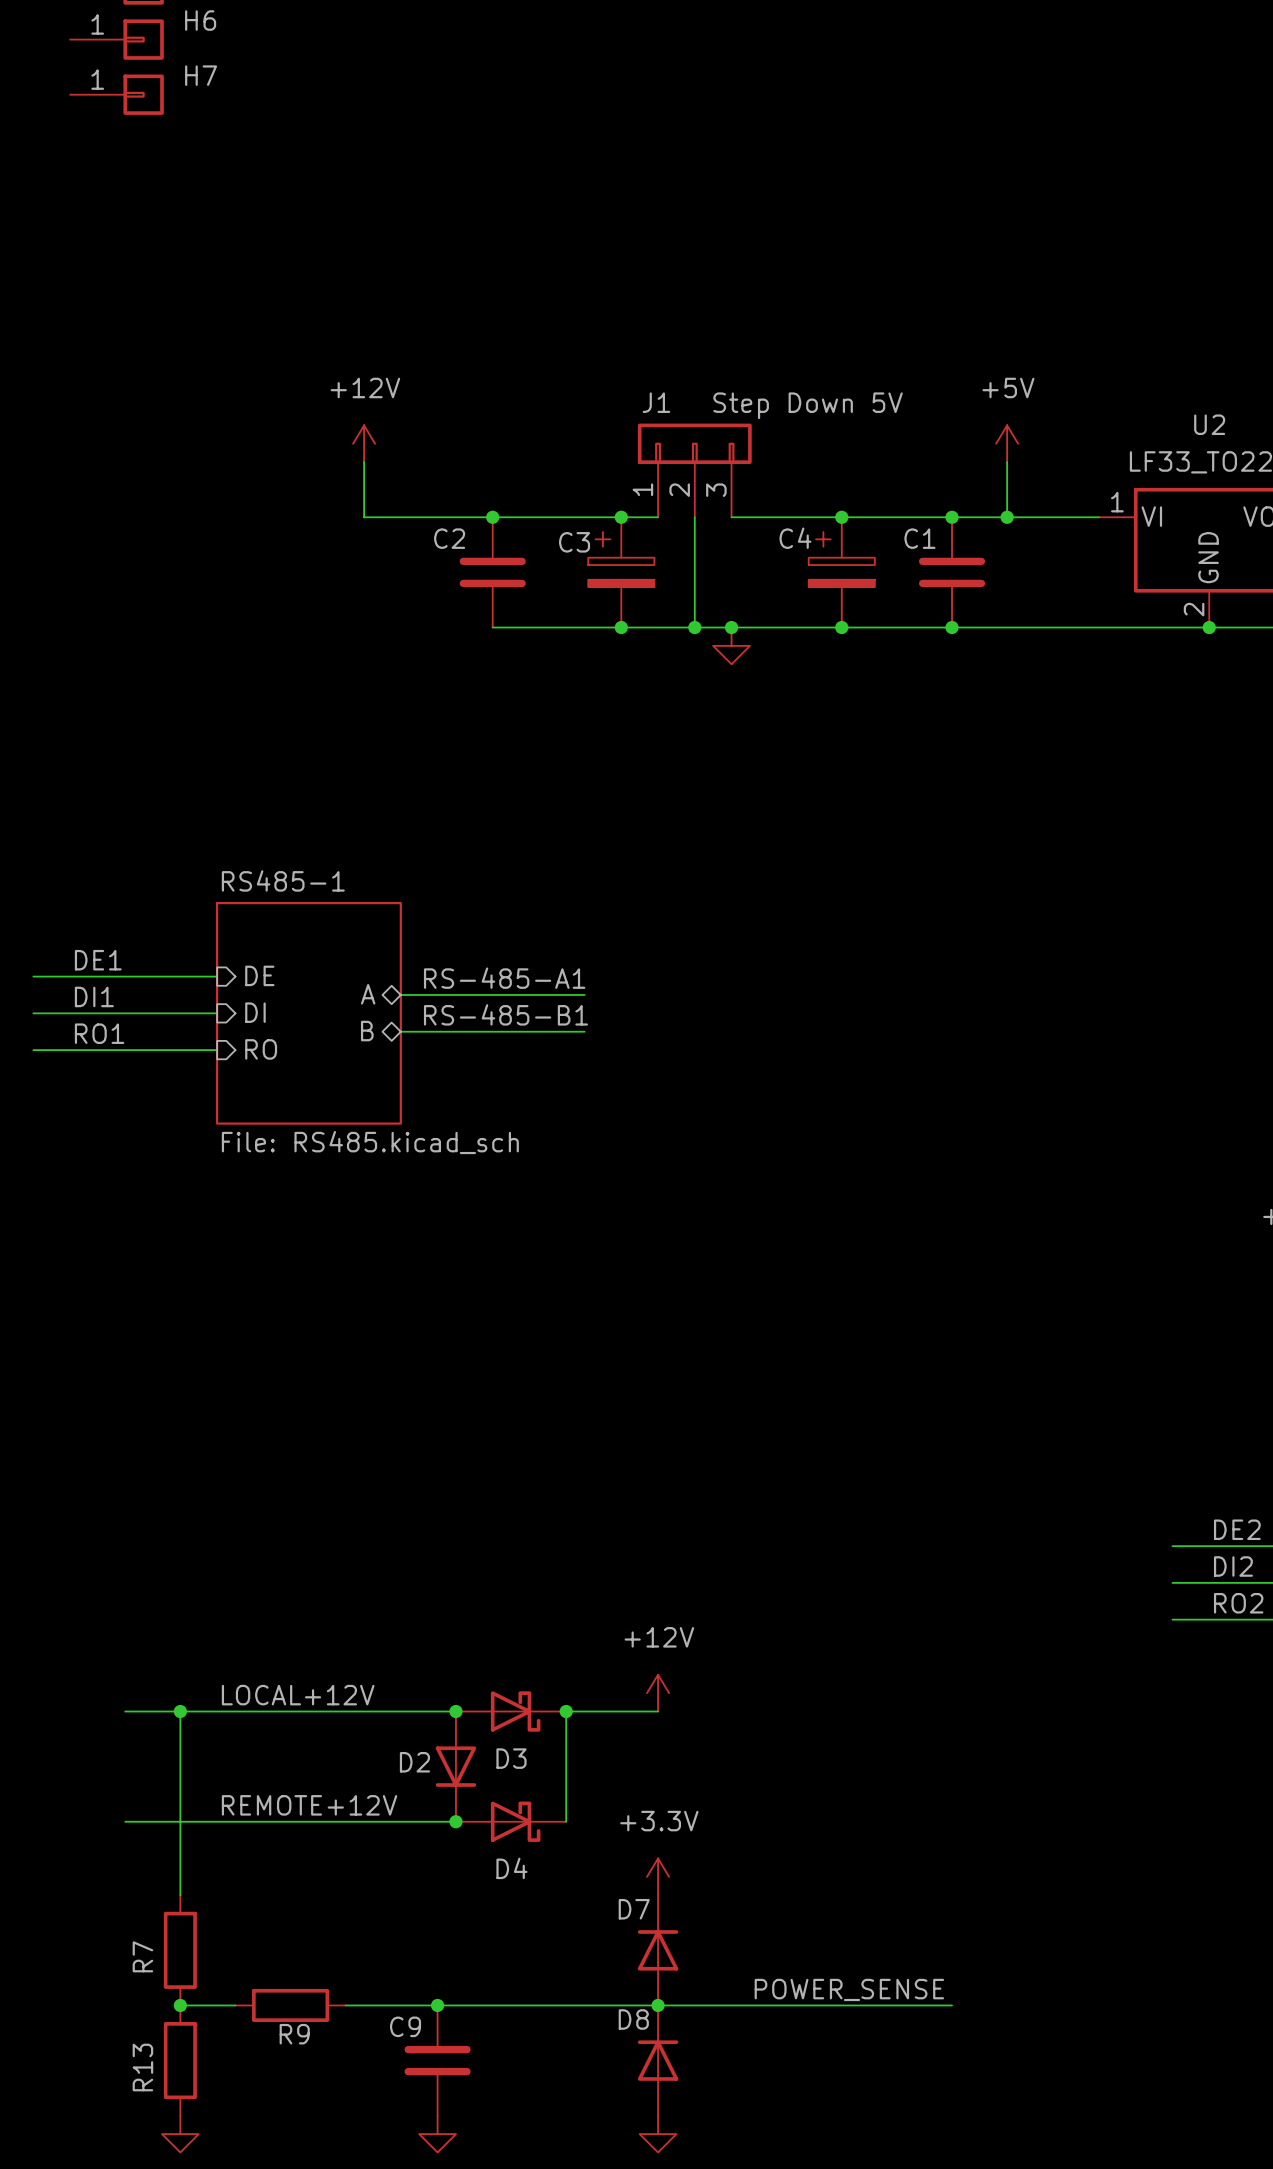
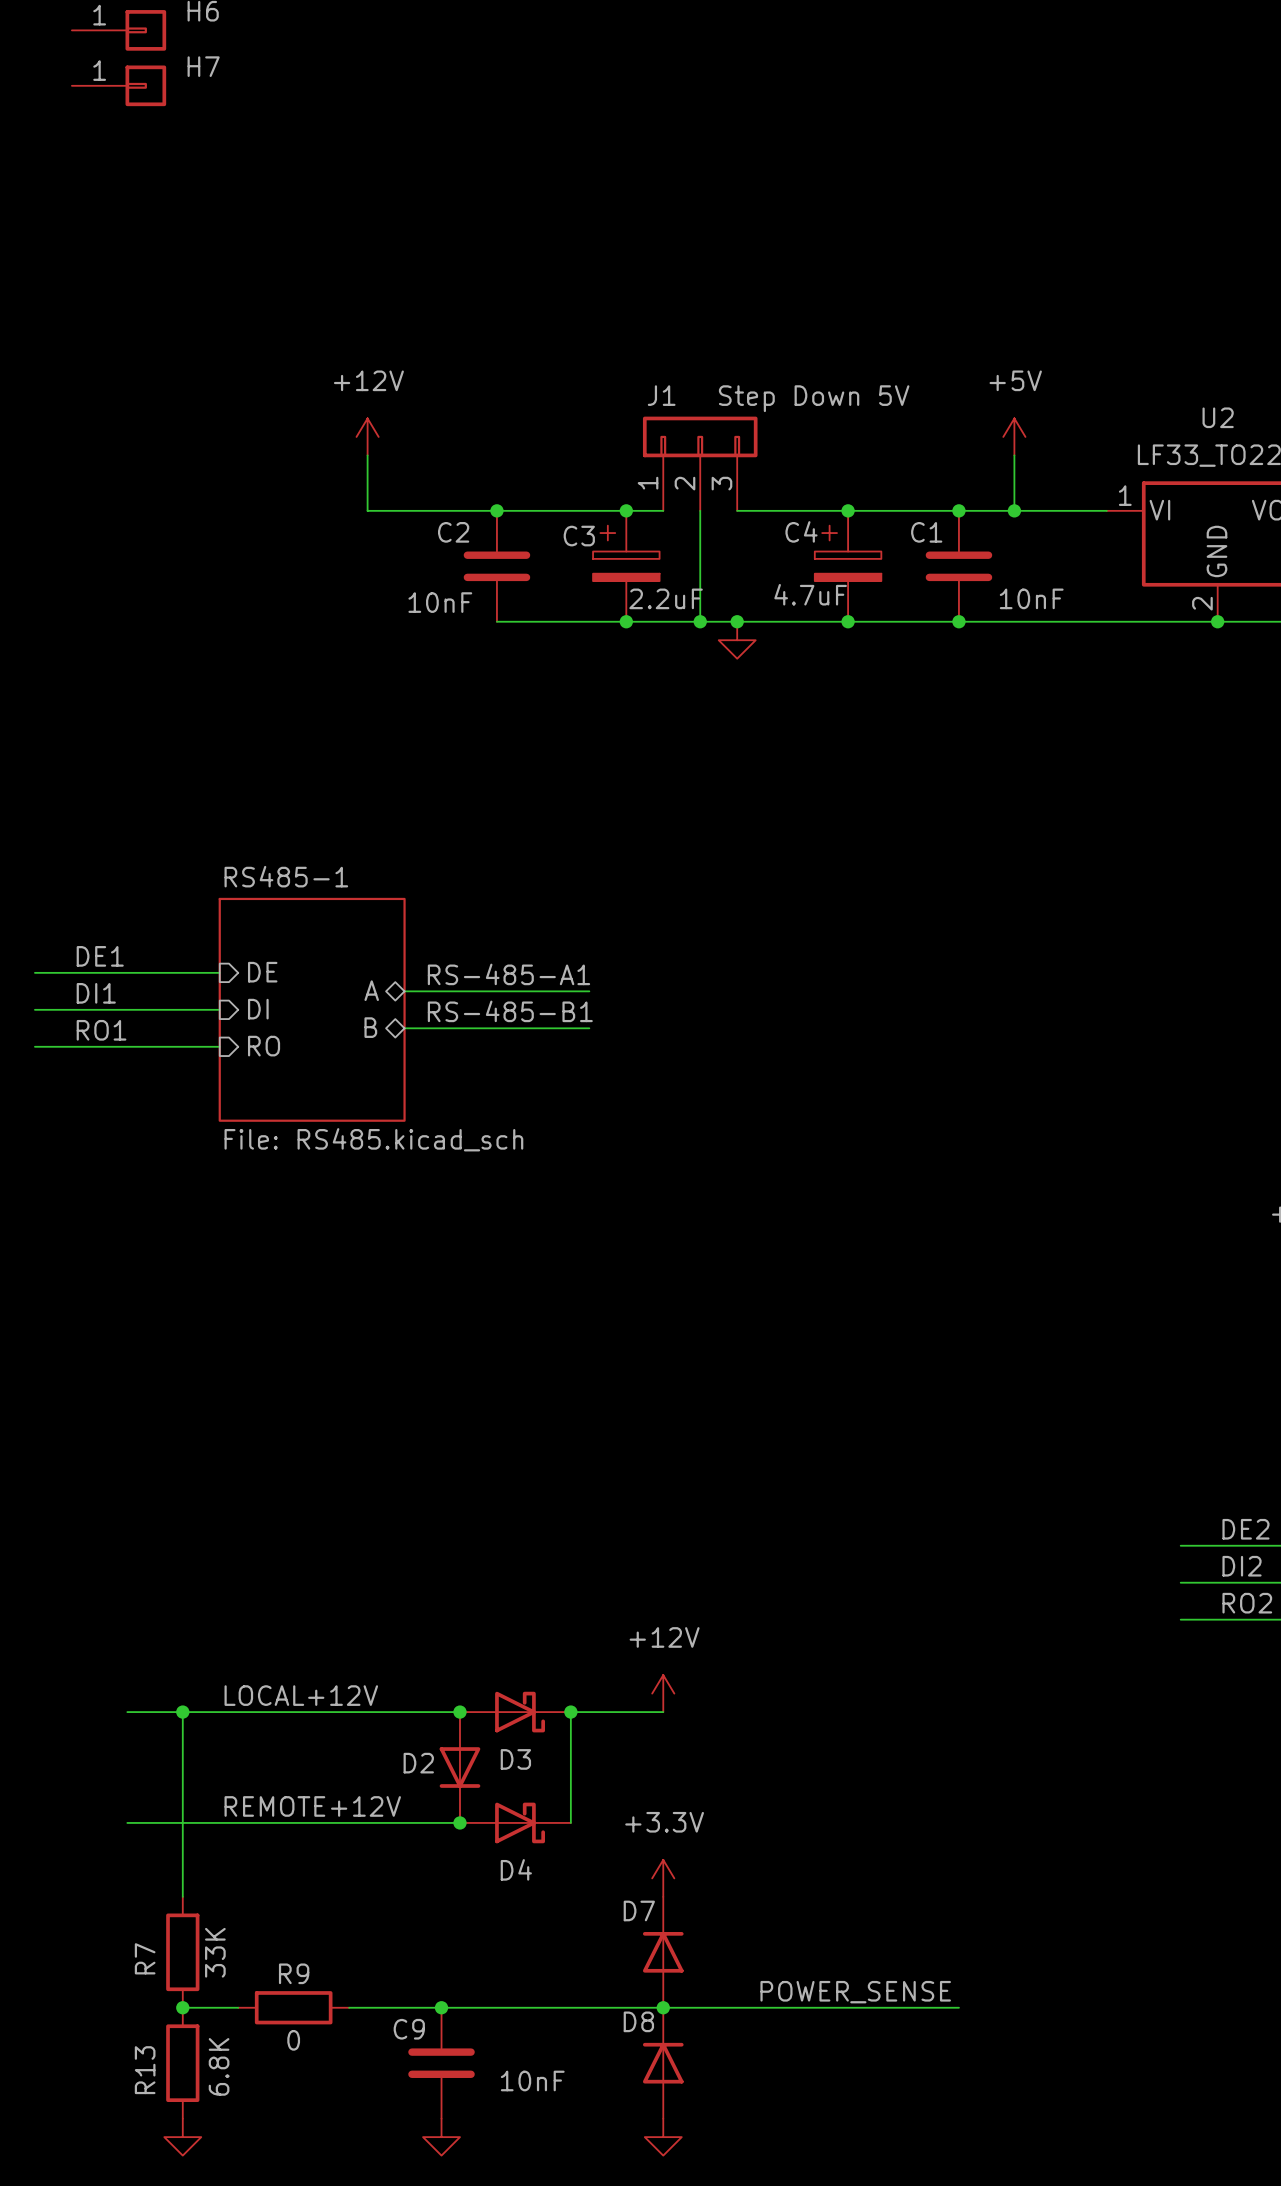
C4 value: none -> 4.7uF (810, 594)
C3 value: none -> 2.2uF (666, 598)
C1 value: none -> 10nF (1031, 598)
C2 value: none -> 10nF (440, 602)
R7 value: none -> 33K (215, 1952)
R9 name position: R9 (294, 2034) -> R9 (294, 1973)
R9 value: none -> 0 (293, 2040)
R13 value: none -> 6.8K (219, 2066)
C9 value: none -> 10nF (532, 2080)

